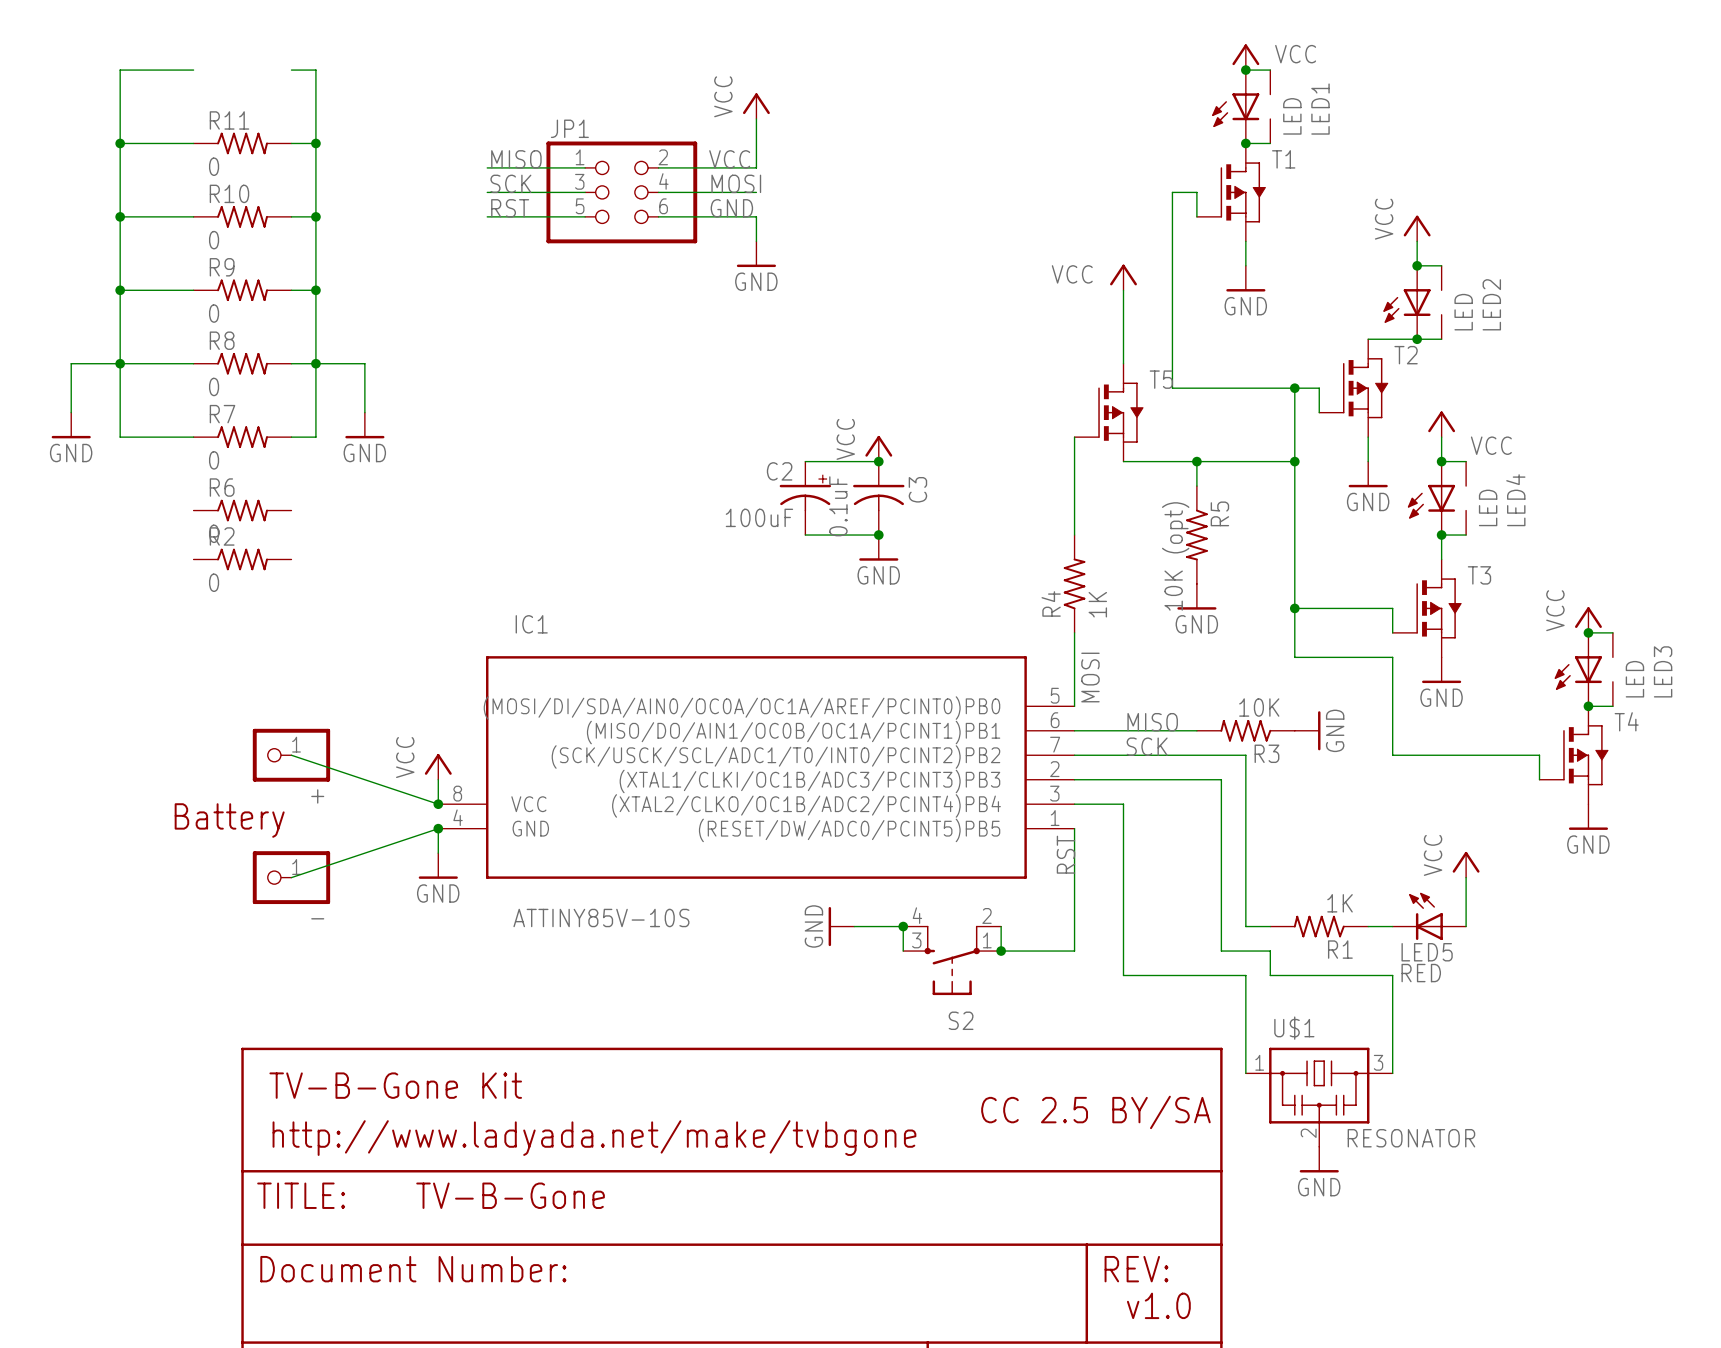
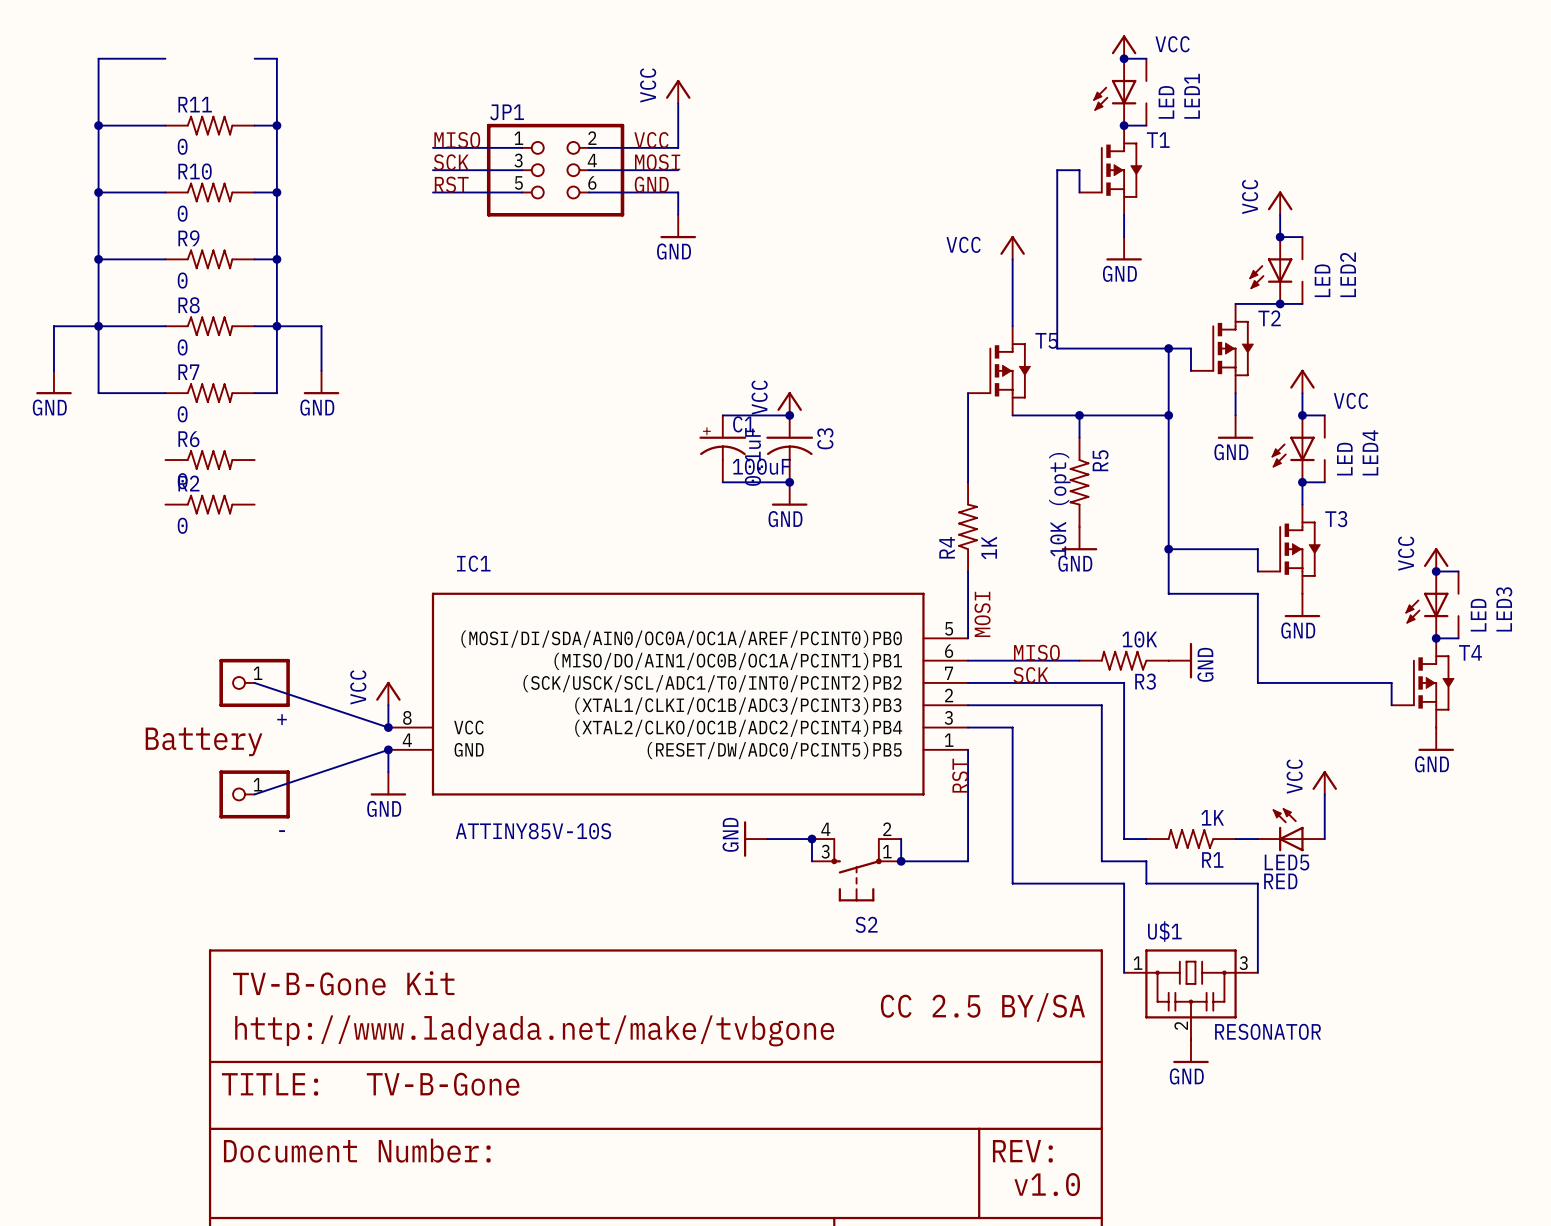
C2: 100uF (805, 498) -> none
C1: none -> 100uF (722, 448)

